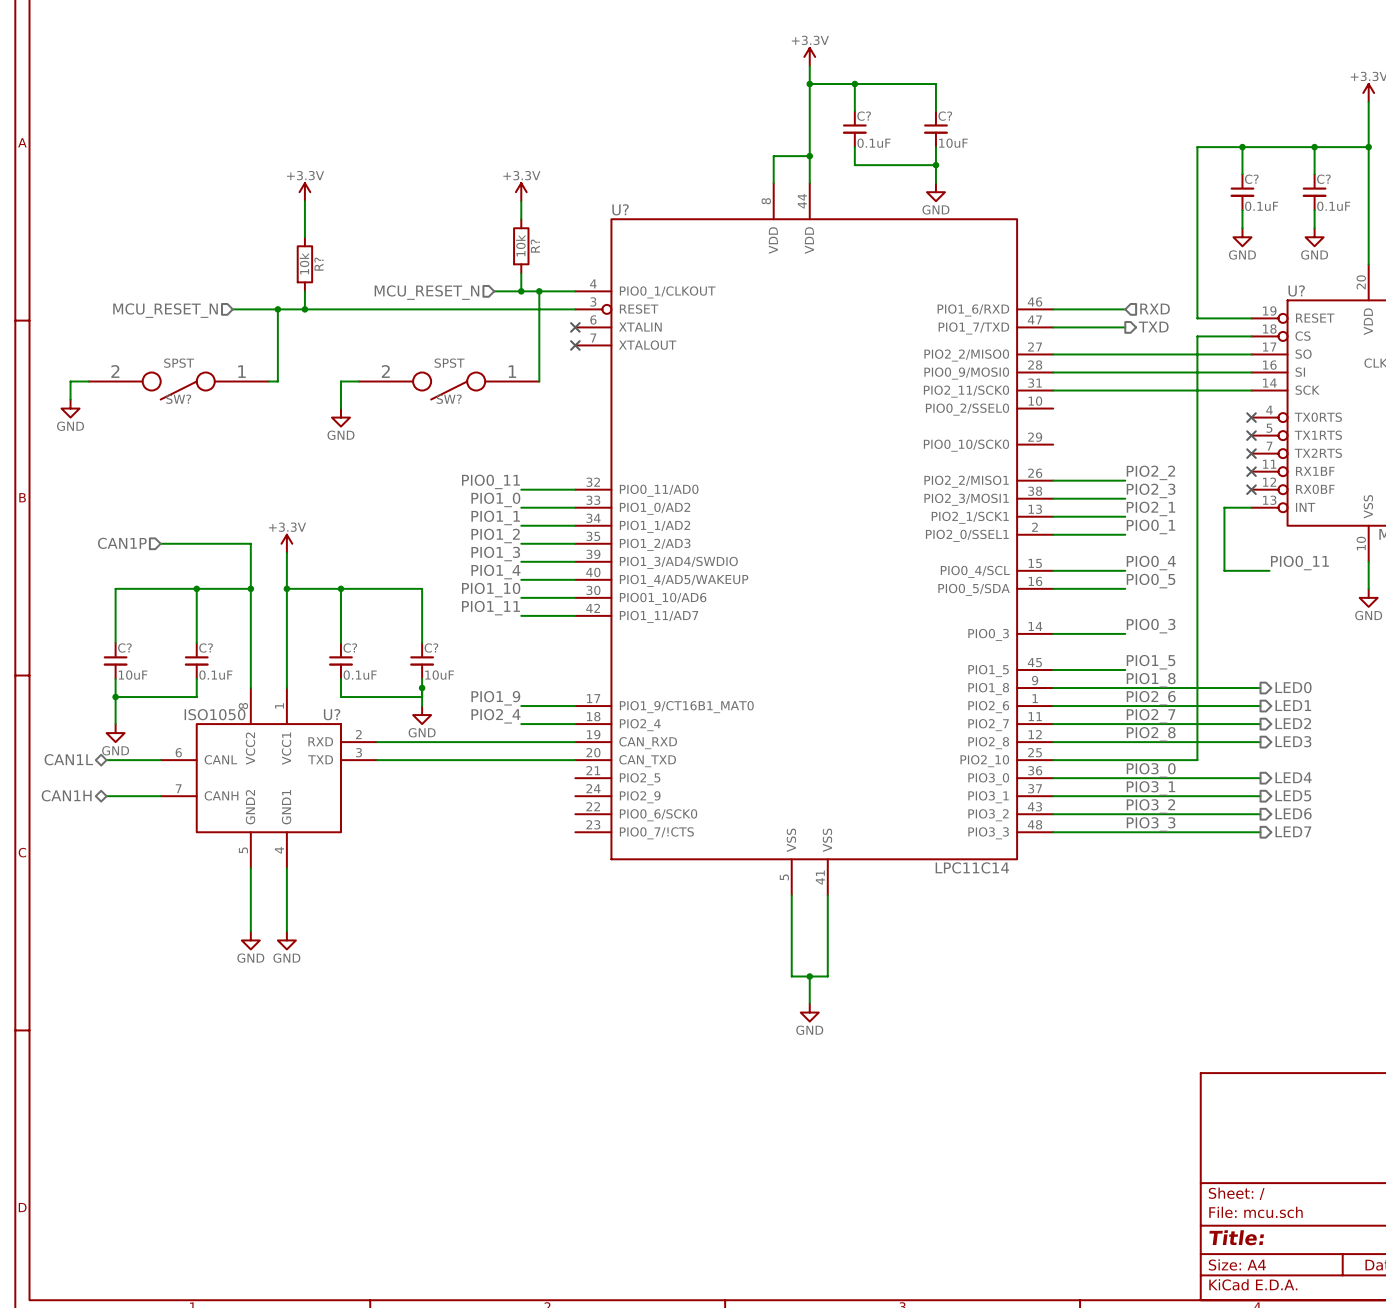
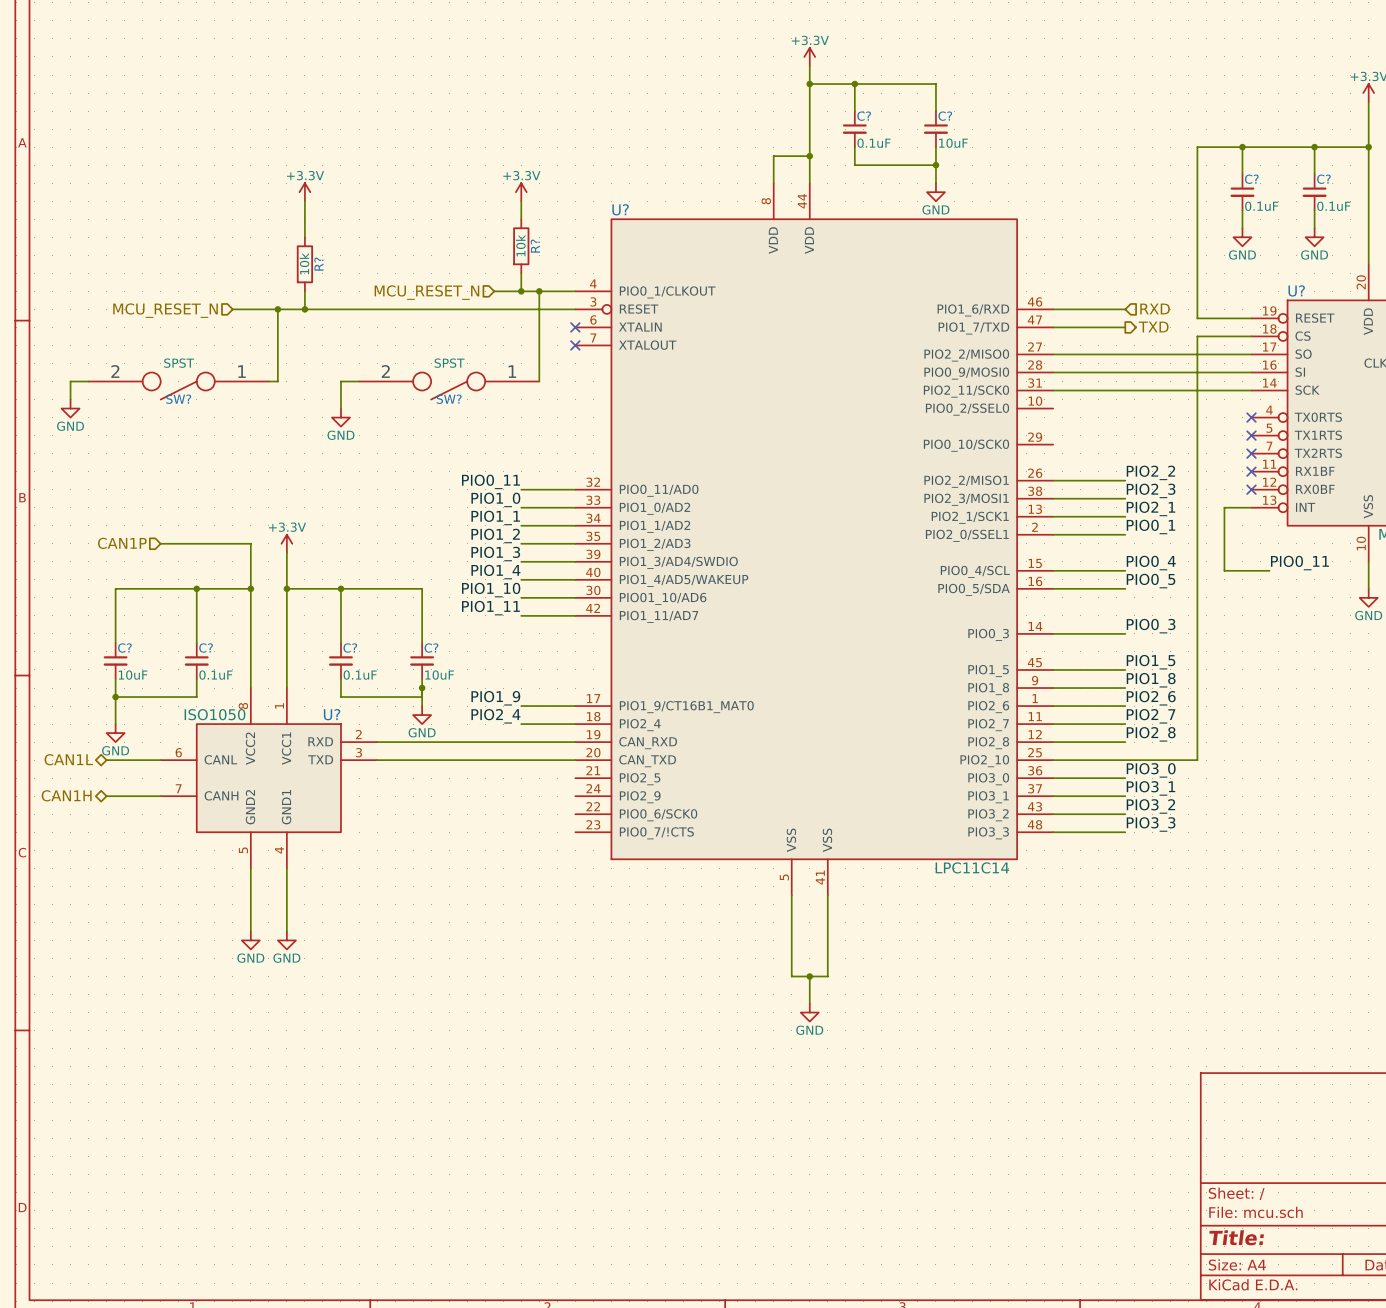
hierarchical label: LED0 (1293, 687) -> none
wire: (1125, 688) (1260, 688) -> none
hierarchical label: LED1 (1293, 705) -> none
wire: (1125, 706) (1260, 706) -> none
hierarchical label: LED2 (1293, 723) -> none
wire: (1125, 724) (1260, 724) -> none
hierarchical label: LED3 (1293, 741) -> none
wire: (1125, 742) (1260, 742) -> none
hierarchical label: LED4 (1293, 777) -> none
wire: (1125, 778) (1260, 778) -> none
hierarchical label: LED5 (1293, 795) -> none
wire: (1125, 796) (1260, 796) -> none
hierarchical label: LED6 (1293, 813) -> none
wire: (1125, 814) (1260, 814) -> none
hierarchical label: LED7 (1293, 831) -> none
wire: (1125, 832) (1260, 832) -> none

